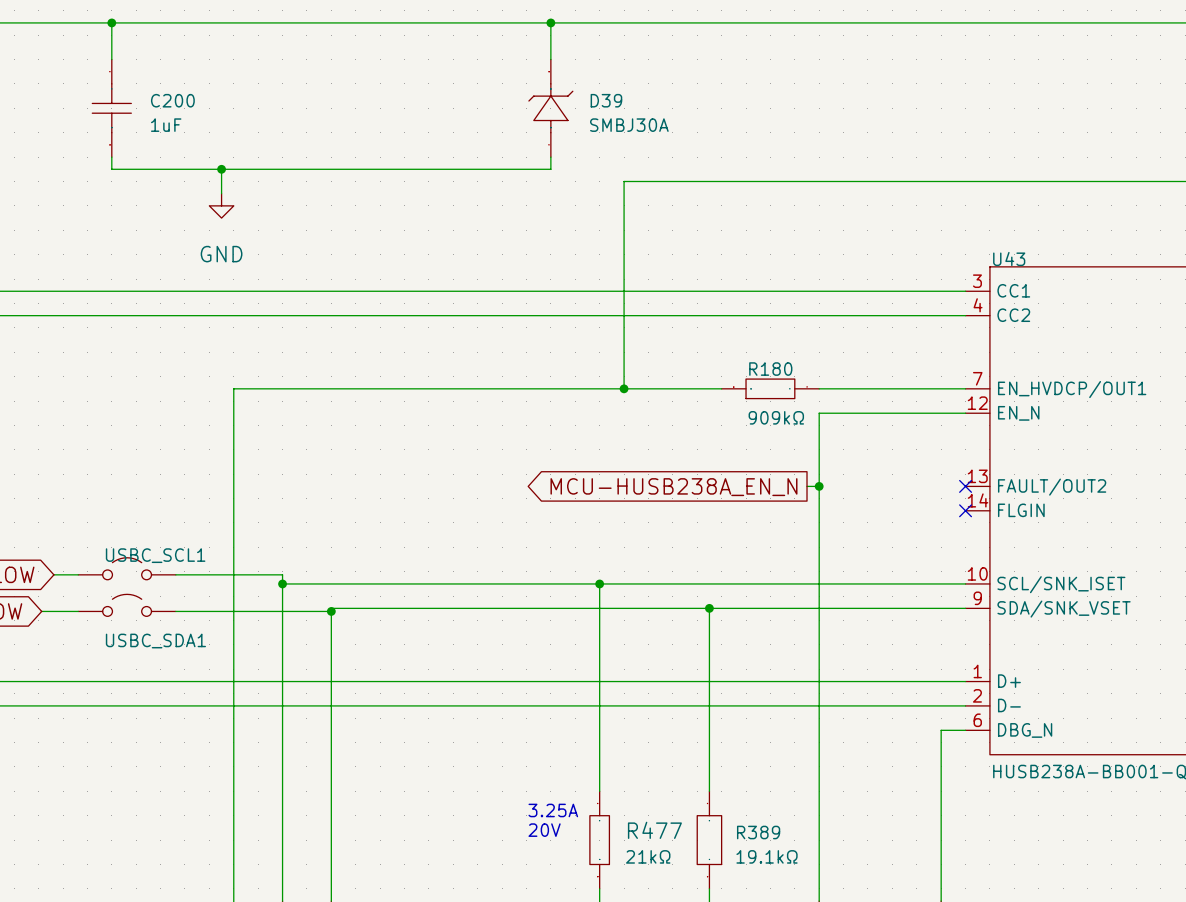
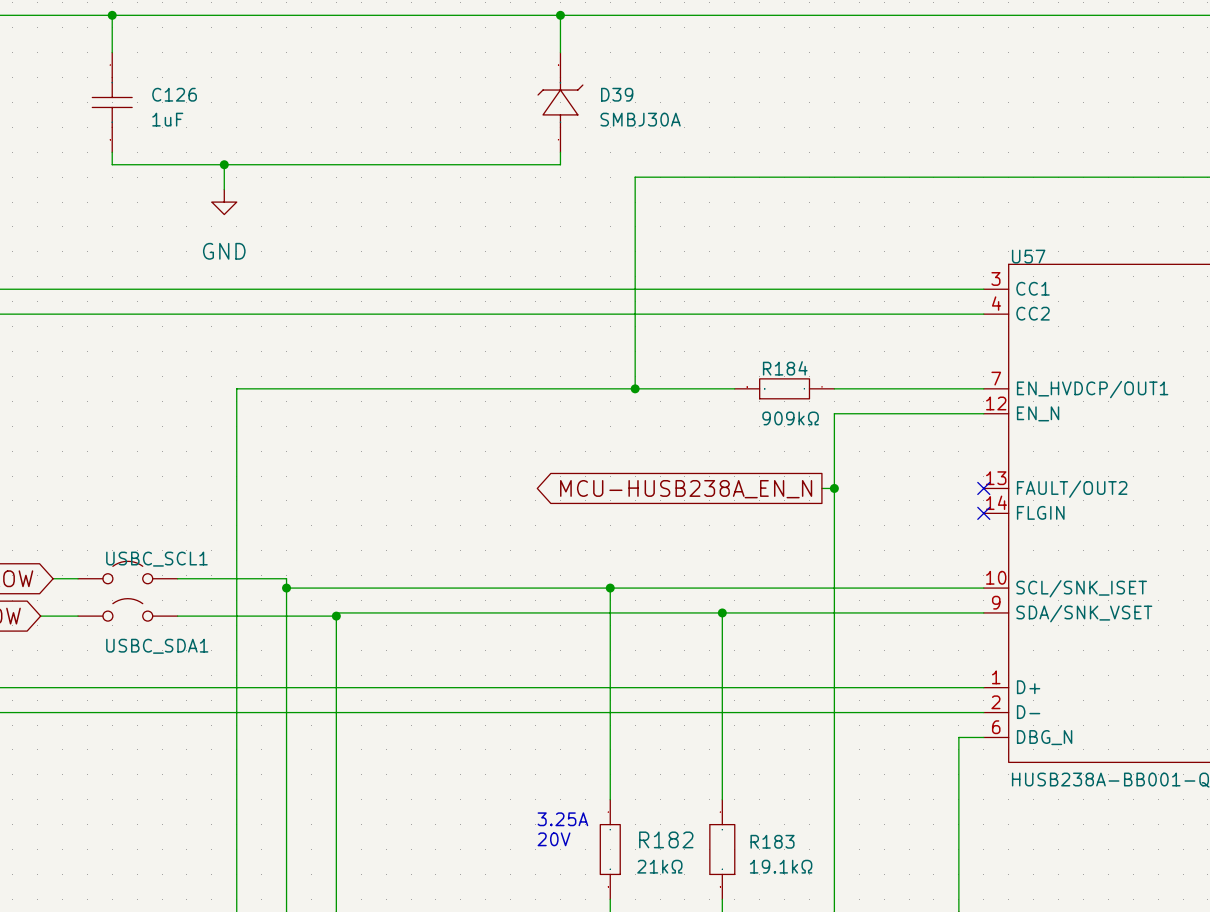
C200 name: C200 (172, 100) -> C126 (174, 94)
U43 name: U43 (1009, 258) -> U57 (1028, 256)
R180 name: R180 (770, 369) -> R184 (785, 368)
R477 name: R477 (654, 830) -> R182 (666, 839)
R389 name: R389 (758, 832) -> R183 (772, 841)

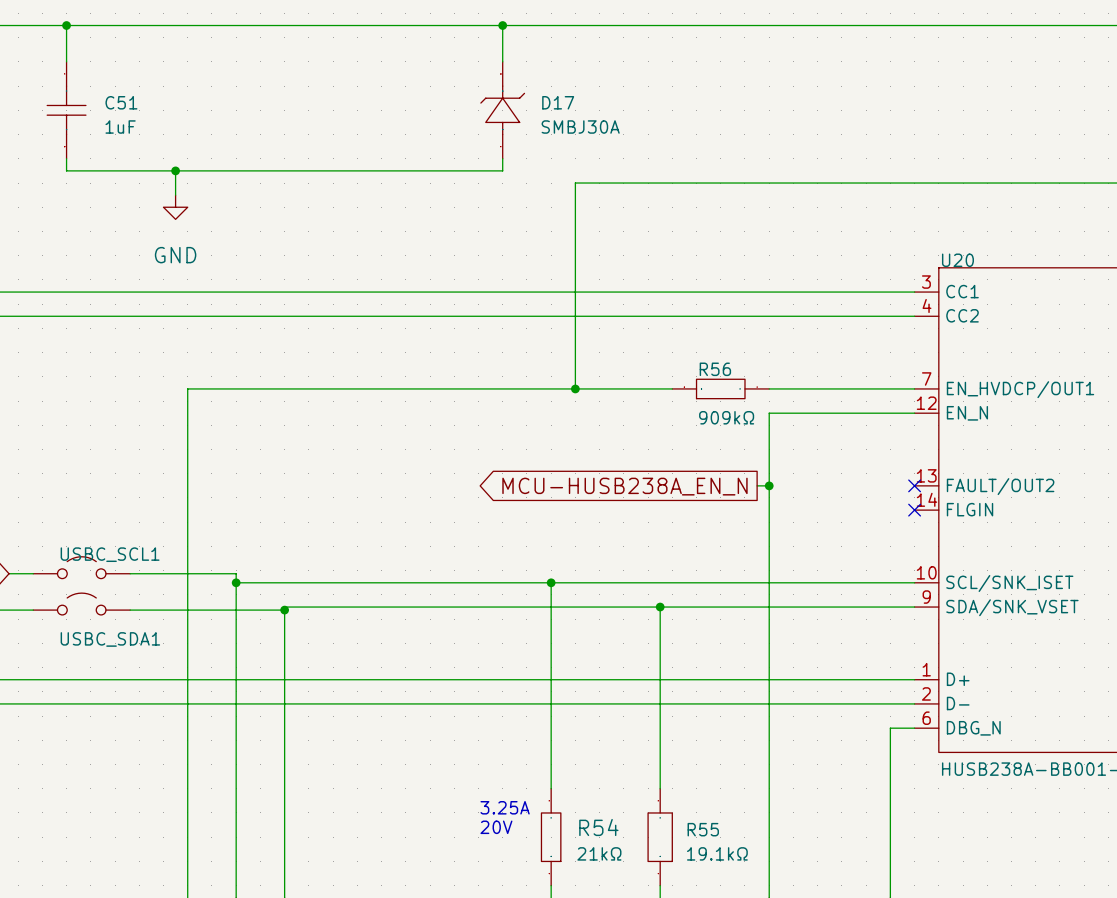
C126 name: C126 (174, 94) -> C51 (121, 102)
D39 name: D39 (617, 94) -> D17 (558, 102)
U57 name: U57 (1028, 256) -> U20 (957, 260)
R184 name: R184 (785, 368) -> R56 (715, 369)
R182 name: R182 (666, 839) -> R54 (598, 827)
R183 name: R183 (772, 841) -> R55 (703, 829)

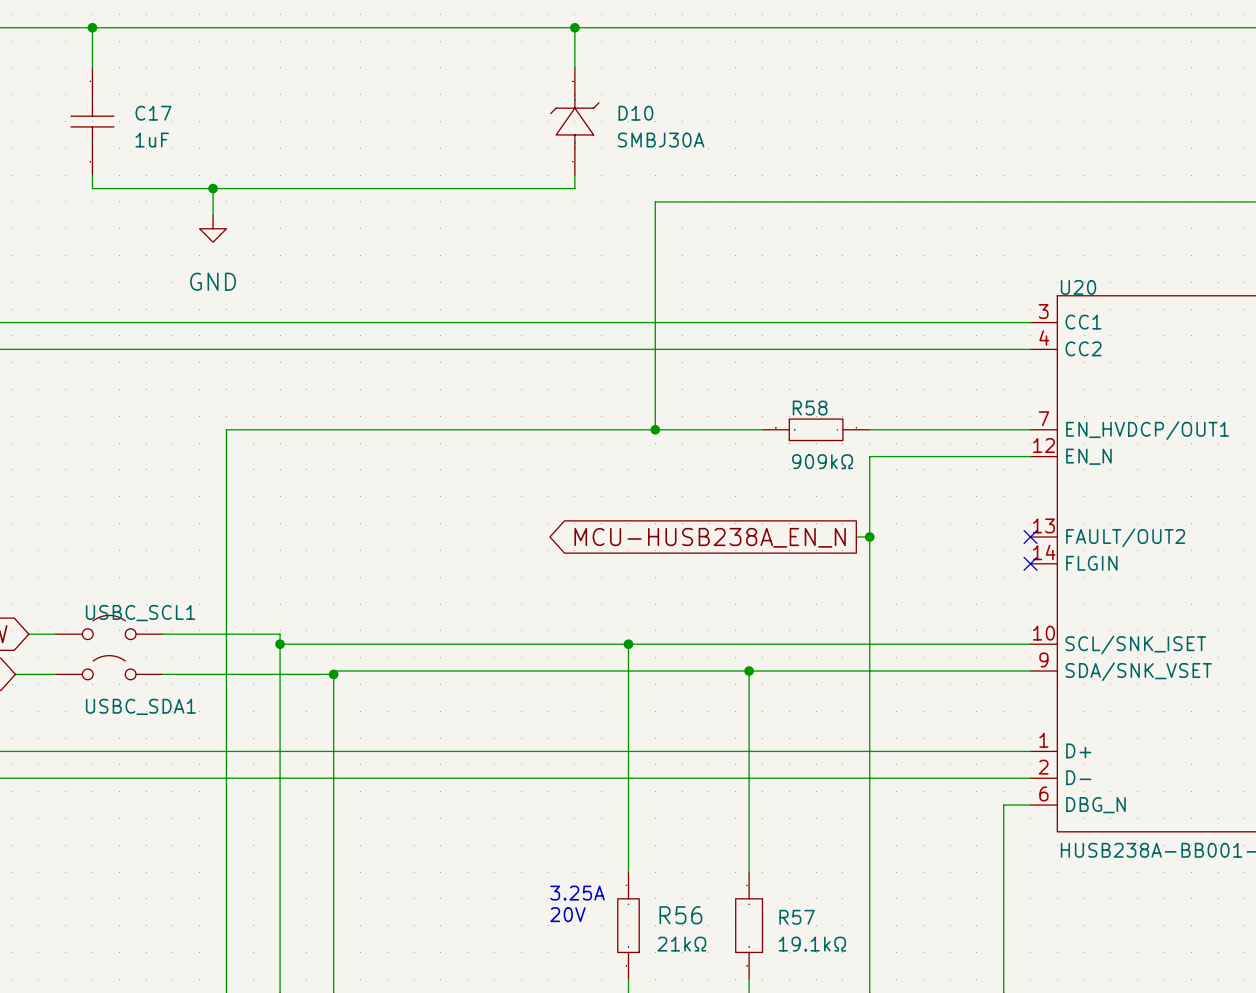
C51 name: C51 (121, 102) -> C17 (153, 113)
D17 name: D17 (558, 102) -> D10 (635, 113)
R56 name: R56 (715, 369) -> R58 (810, 408)
R54 name: R54 (598, 827) -> R56 (680, 915)
R55 name: R55 (703, 829) -> R57 (797, 917)

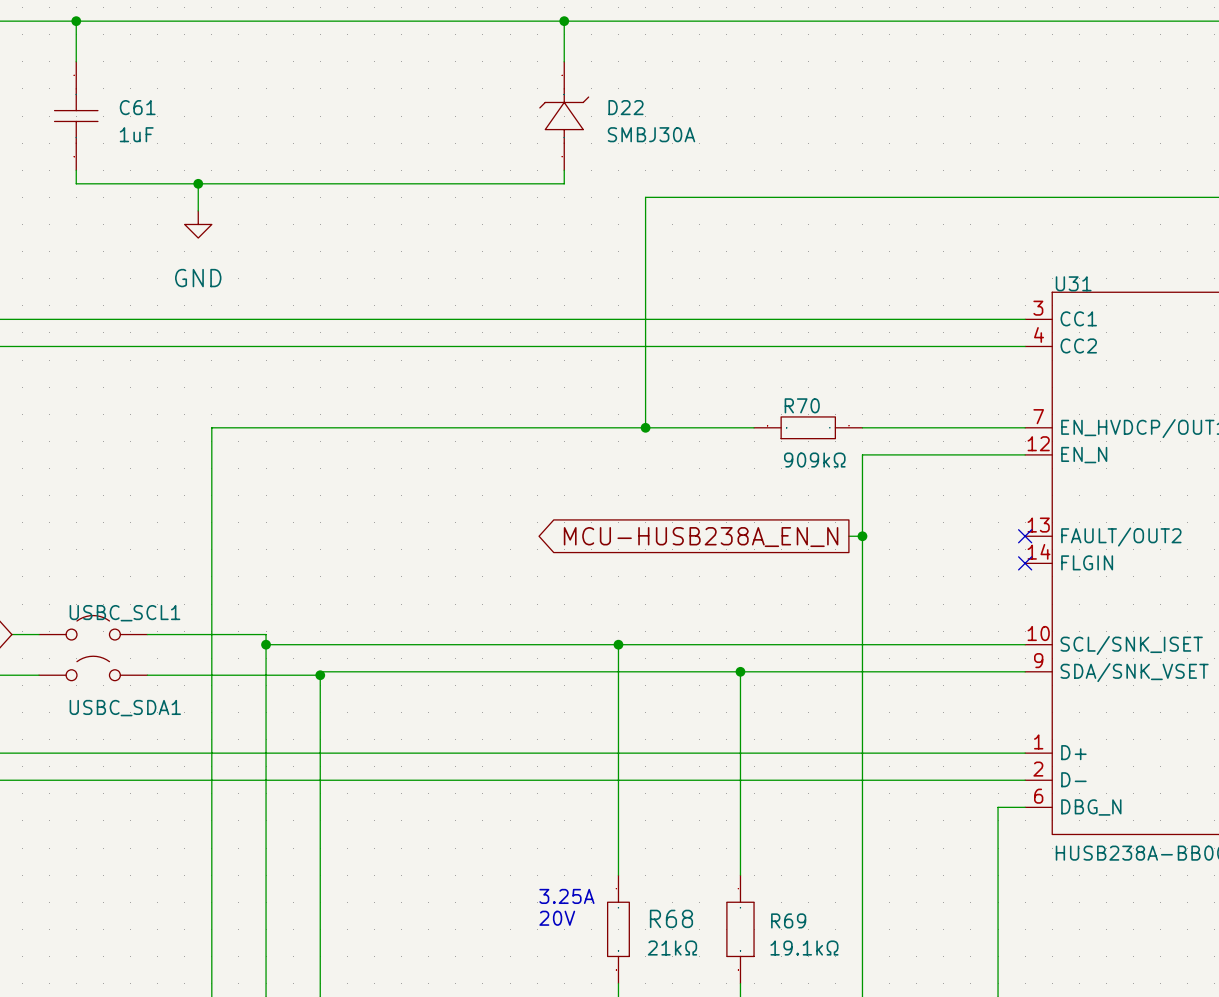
C17 name: C17 (153, 113) -> C61 (137, 107)
D10 name: D10 (635, 113) -> D22 (625, 107)
U20 name: U20 (1078, 287) -> U31 (1073, 283)
R58 name: R58 (810, 408) -> R70 (802, 405)
R56 name: R56 (680, 915) -> R68 (671, 918)
R57 name: R57 (797, 917) -> R69 (788, 920)

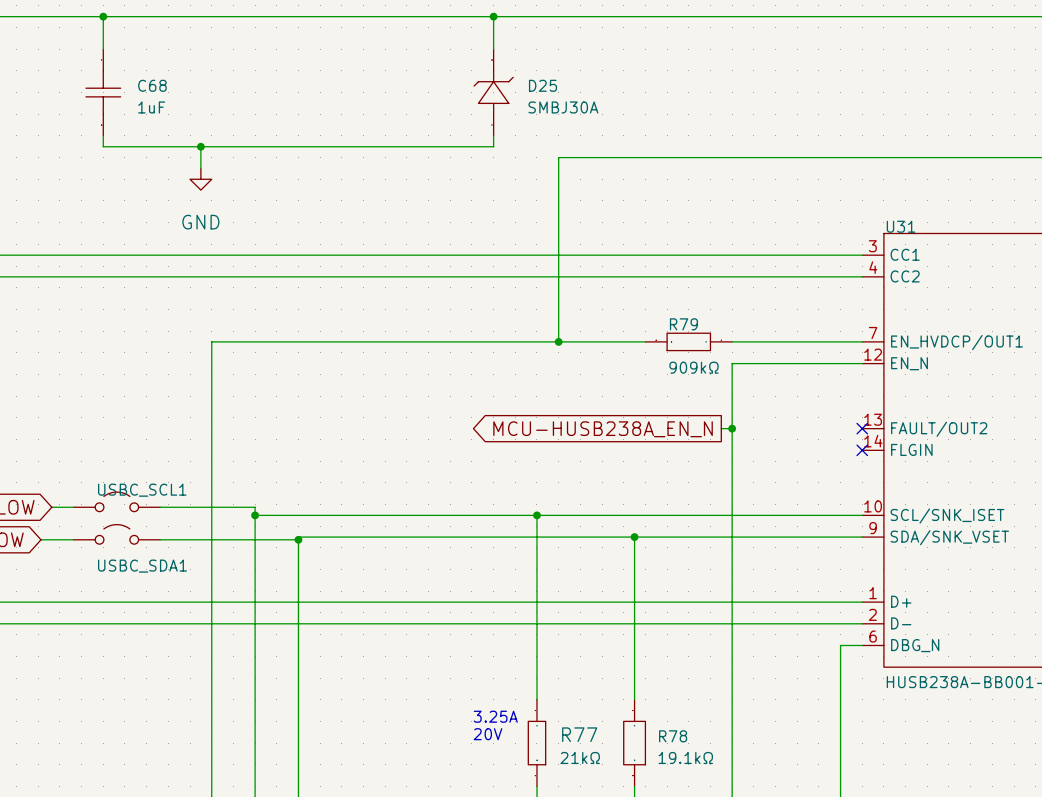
C61 name: C61 (137, 107) -> C68 (152, 85)
D22 name: D22 (625, 107) -> D25 (543, 85)
R70 name: R70 (802, 405) -> R79 (683, 324)
R68 name: R68 (671, 918) -> R77 (579, 734)
R69 name: R69 (788, 920) -> R78 (673, 736)

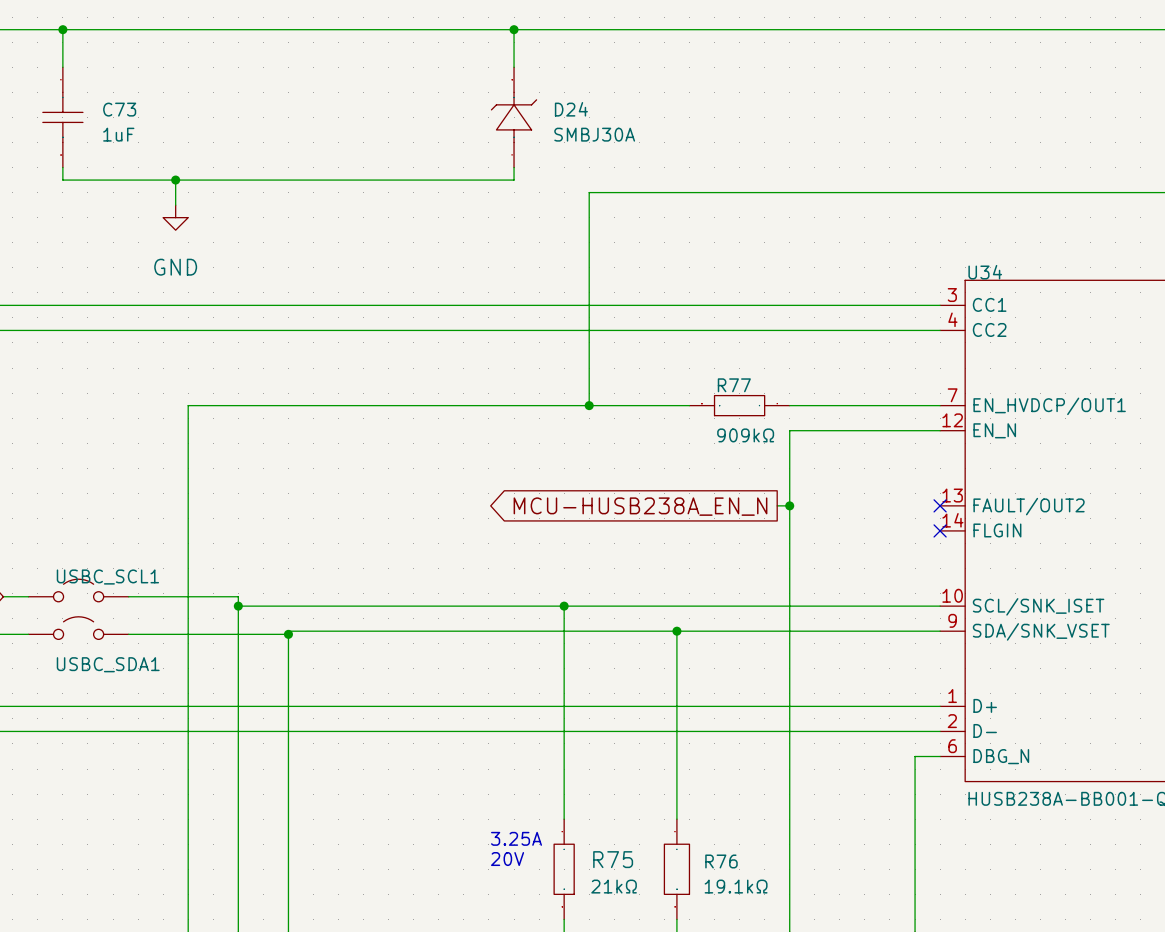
C68 name: C68 (152, 85) -> C73 (119, 109)
D25 name: D25 (543, 85) -> D24 (571, 109)
U31 name: U31 (901, 226) -> U34 (985, 272)
R79 name: R79 (683, 324) -> R77 (734, 385)
R77 name: R77 (579, 734) -> R75 (613, 859)
R78 name: R78 (673, 736) -> R76 (721, 861)

